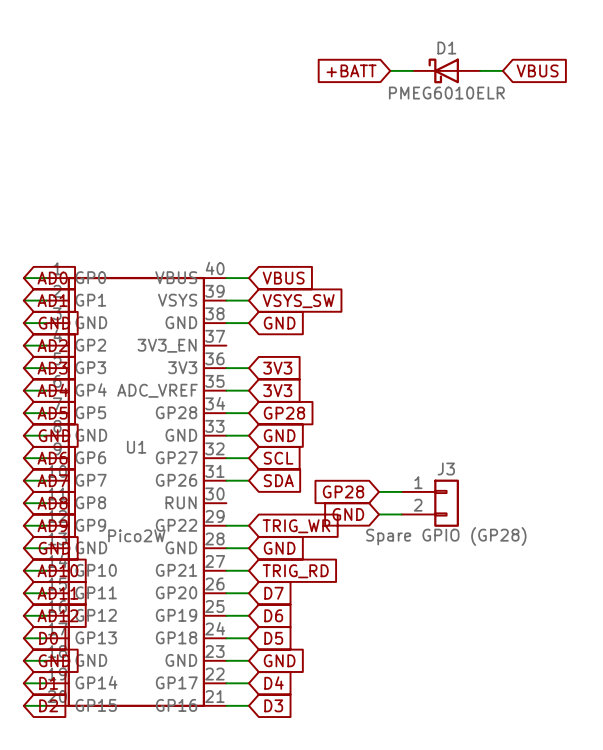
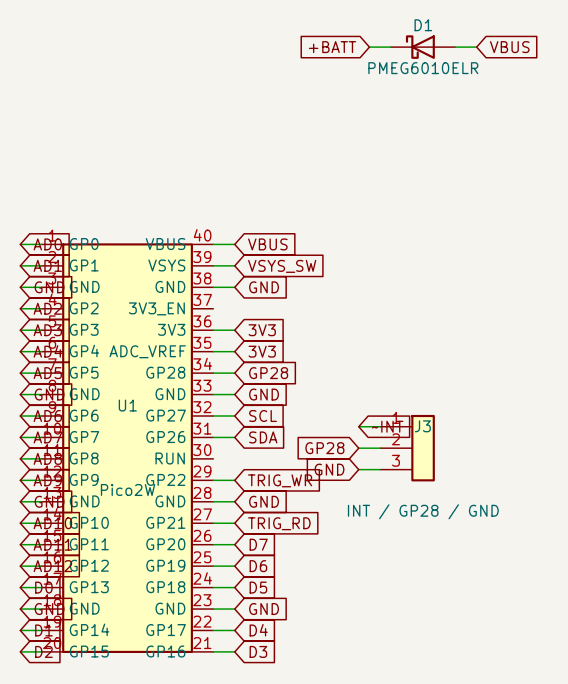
wire: none -> (358, 426) (380, 426)
global label: none -> ~INT (387, 426)
J3 symbol: [401, 479, 459, 527] -> [380, 414, 435, 482]
J3 value: Spare GPIO (GP28) (446, 536) -> INT / GP28 / GND (423, 511)

